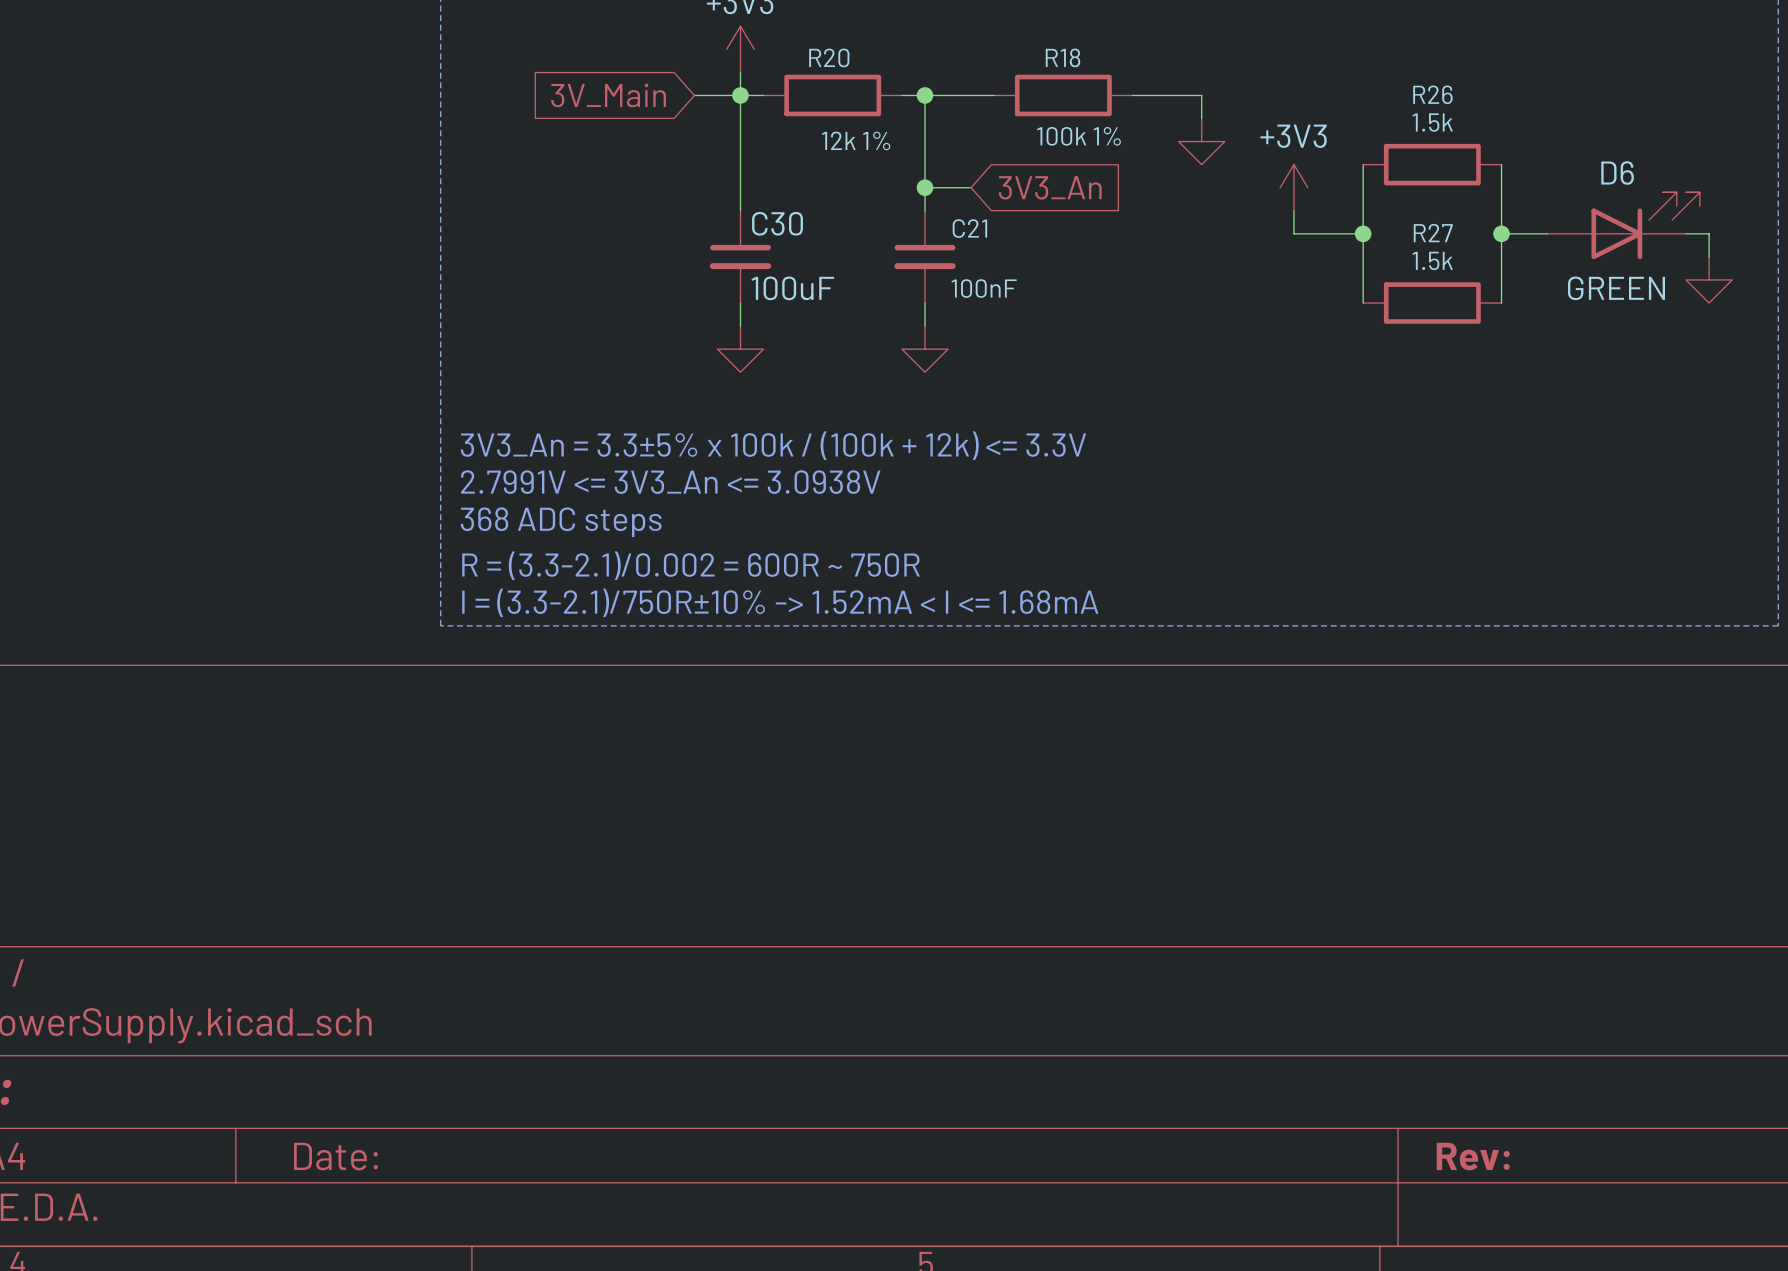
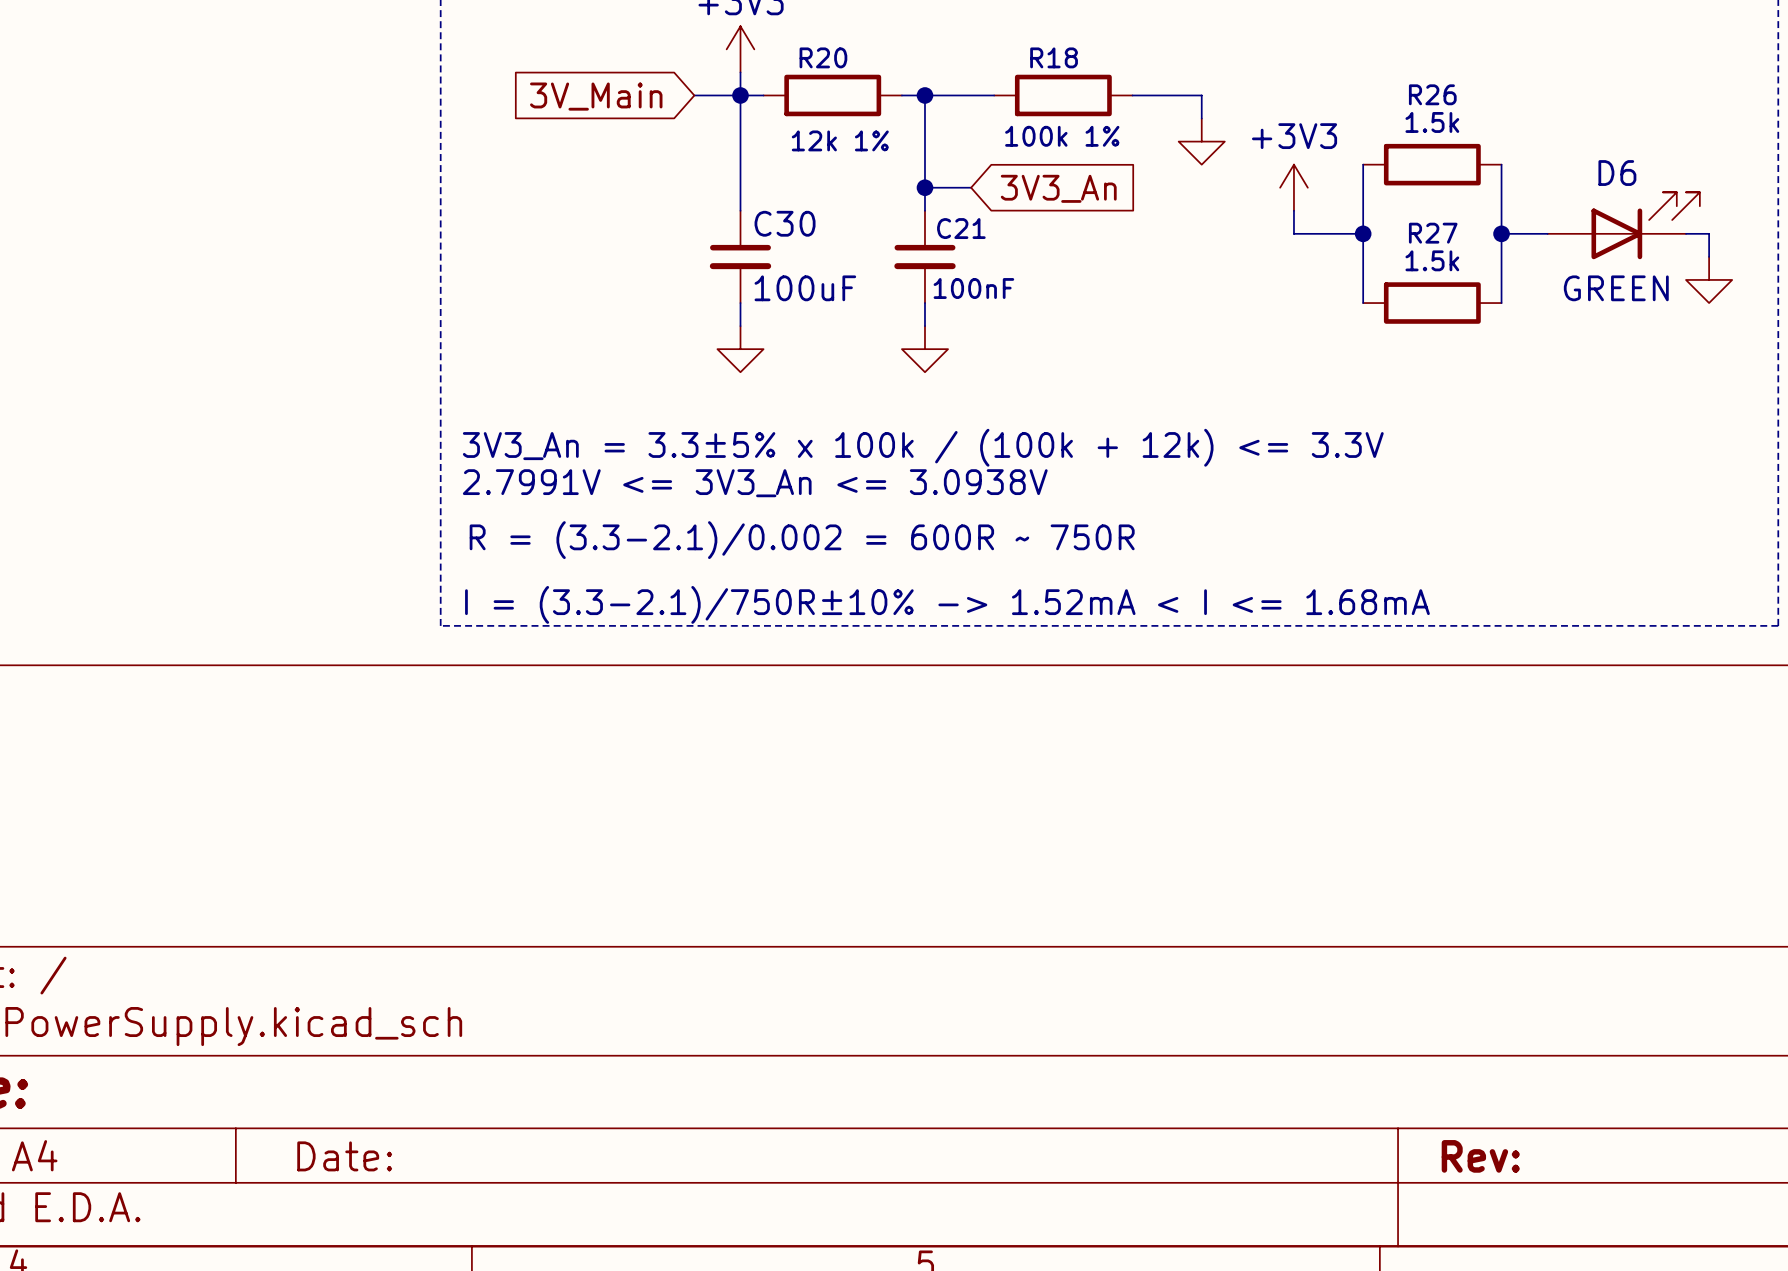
text: 368 ADC steps (561, 522) -> none
text position: R = (3.3-2.1)/0.002 = 600R ~ 750R (691, 565) -> R = (3.3-2.1)/0.002 = 600R ~ 750R (802, 540)

